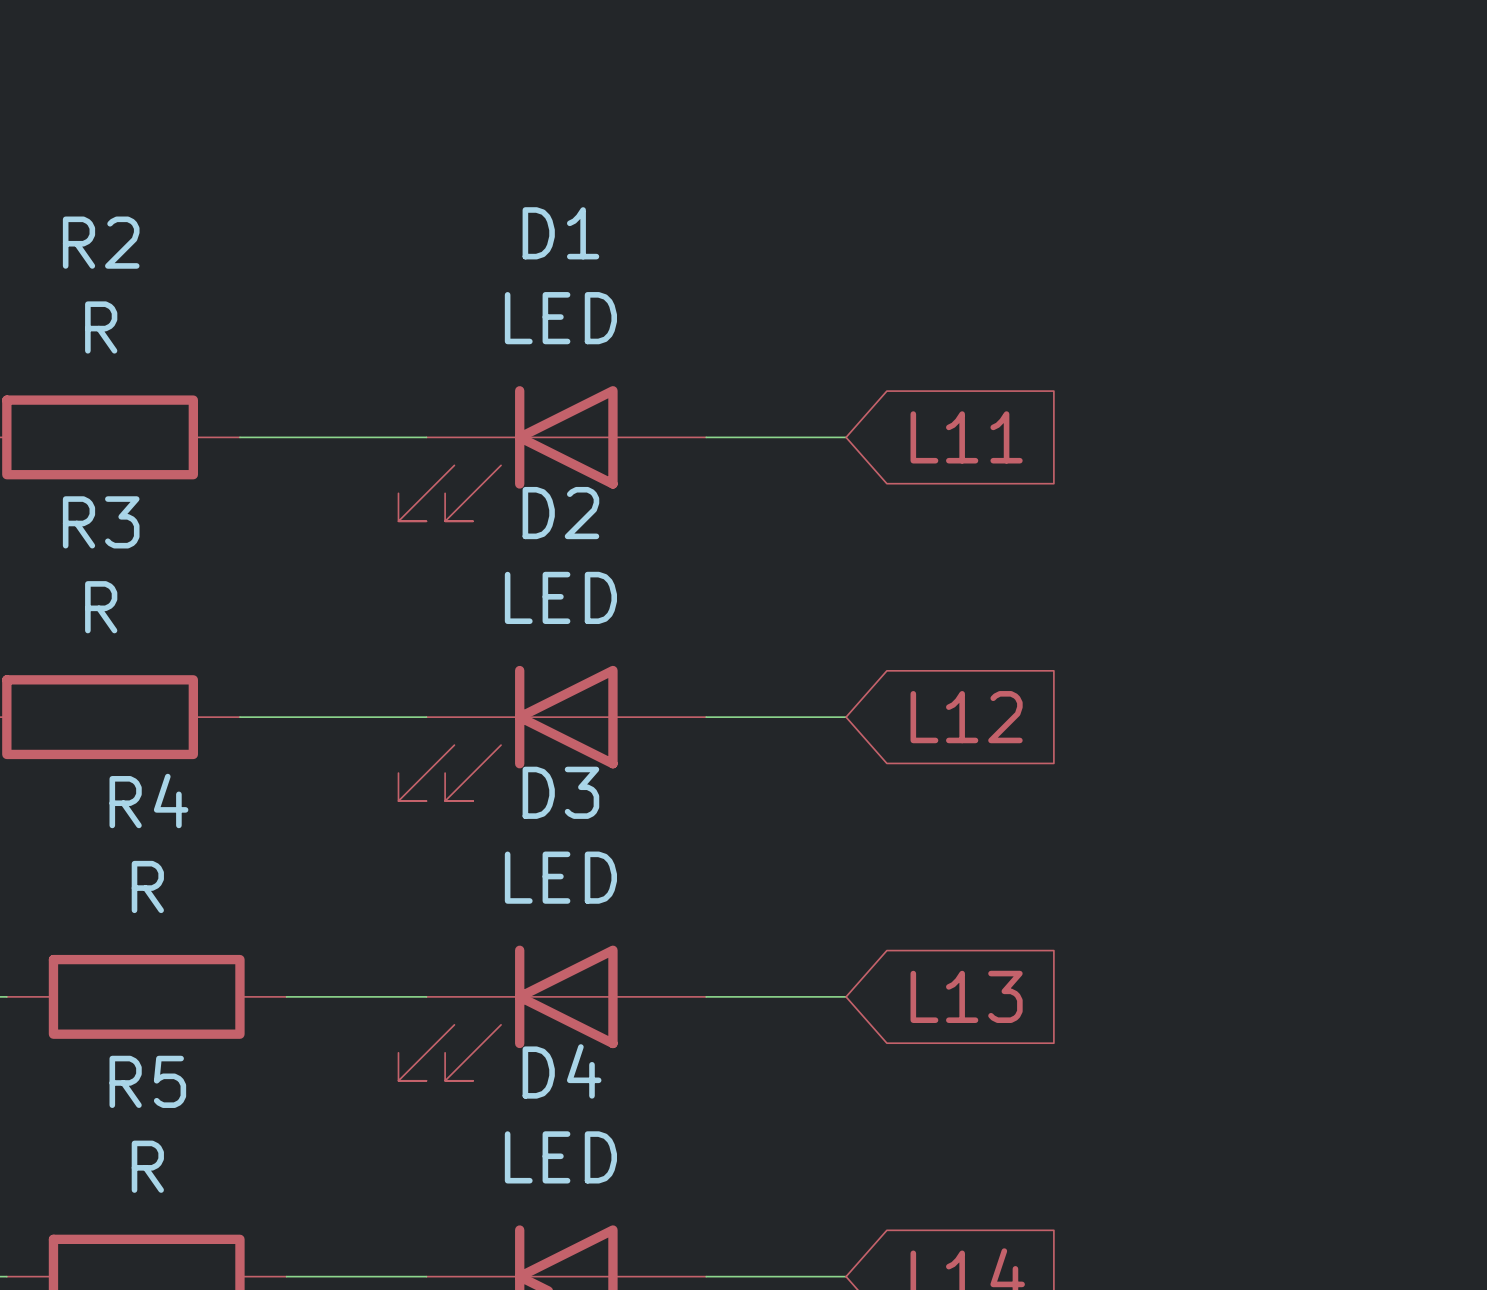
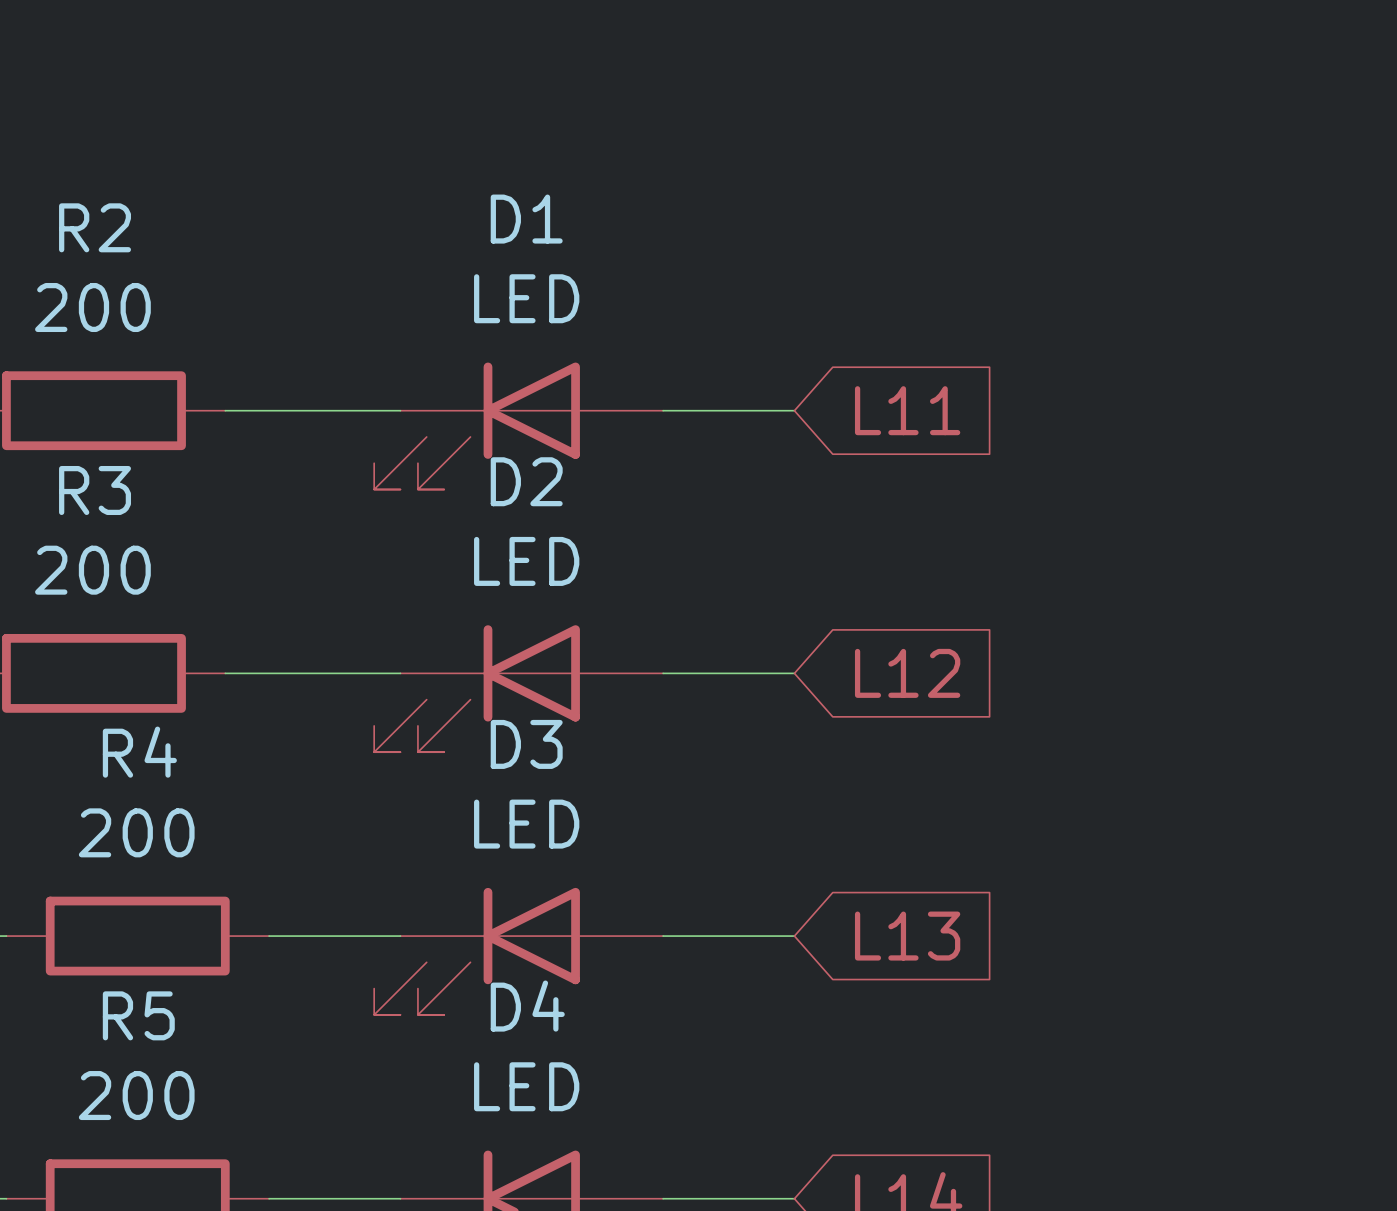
R2 value: R (101, 327) -> 200 (92, 307)
R3 value: R (101, 607) -> 200 (92, 570)
R4 value: R (147, 886) -> 200 (136, 832)
R5 value: R (147, 1166) -> 200 (136, 1095)

